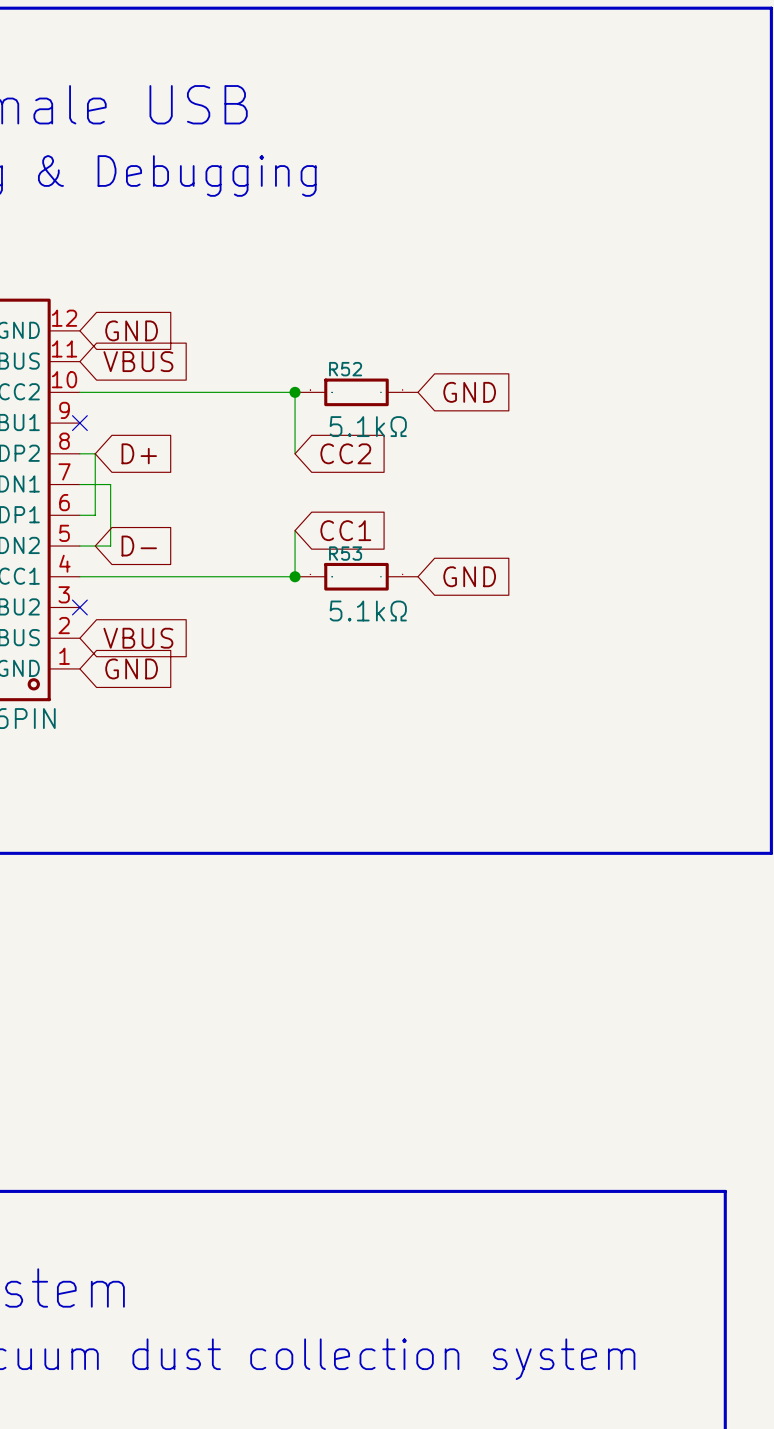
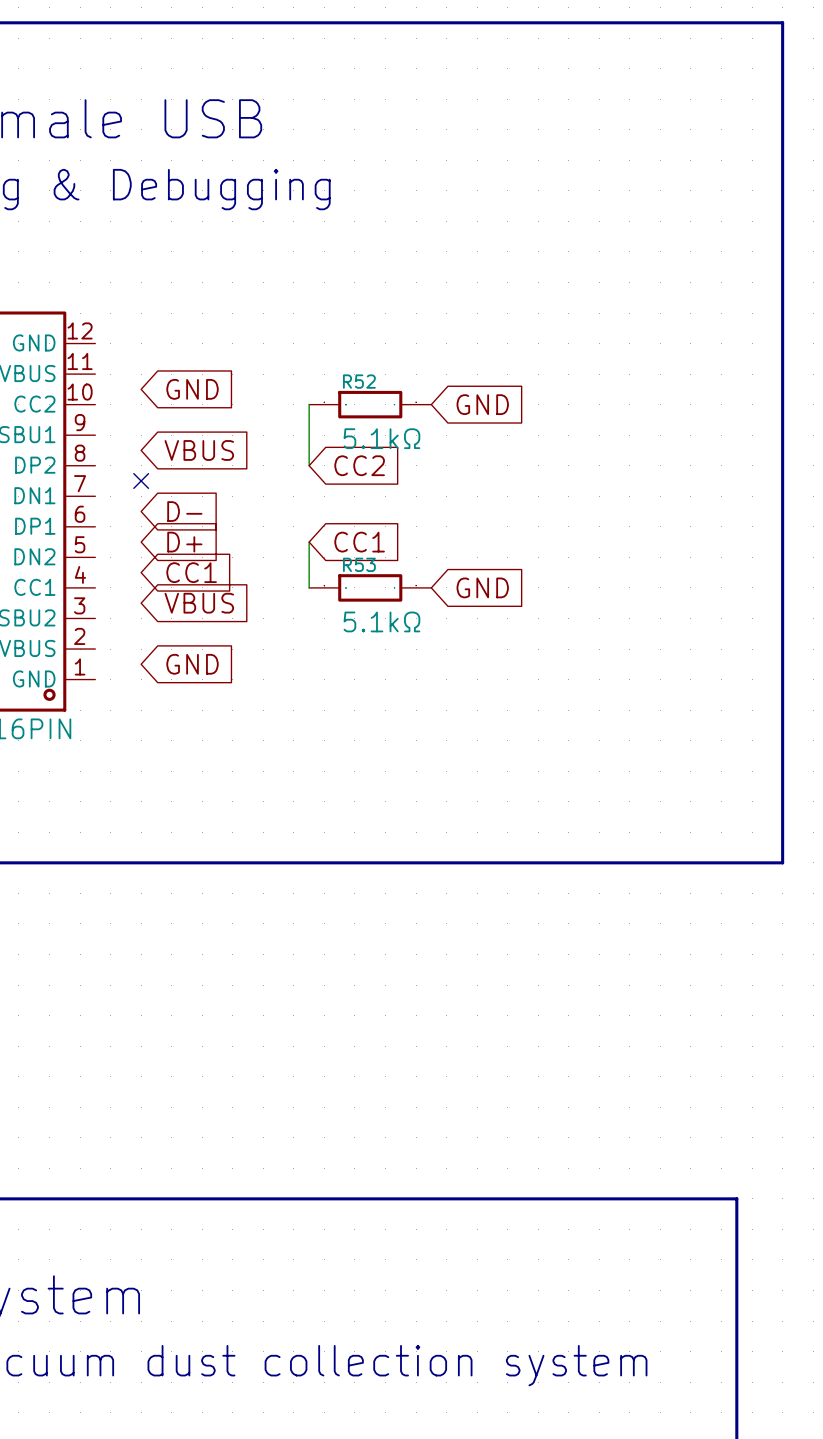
global label position: GND (131, 330) -> GND (192, 389)
global label position: VBUS (138, 361) -> VBUS (199, 450)
wire: (79, 392) (295, 392) -> none
junction: (295, 392) -> none
no-connect mark position: (79, 423) -> (141, 481)
wire: (79, 453) (95, 453) (95, 515) (79, 515) -> none
global label position: D+ (139, 453) -> D+ (184, 542)
wire: (79, 484) (110, 484) (110, 546) (79, 546) -> none
global label position: D- (139, 546) -> D- (184, 511)
global label: none -> CC1 (191, 572)
wire: (79, 576) (295, 576) -> none
junction: (295, 576) -> none
no-connect mark: (79, 607) -> none
global label position: VBUS (138, 638) -> VBUS (199, 603)
global label position: GND (131, 668) -> GND (192, 664)

